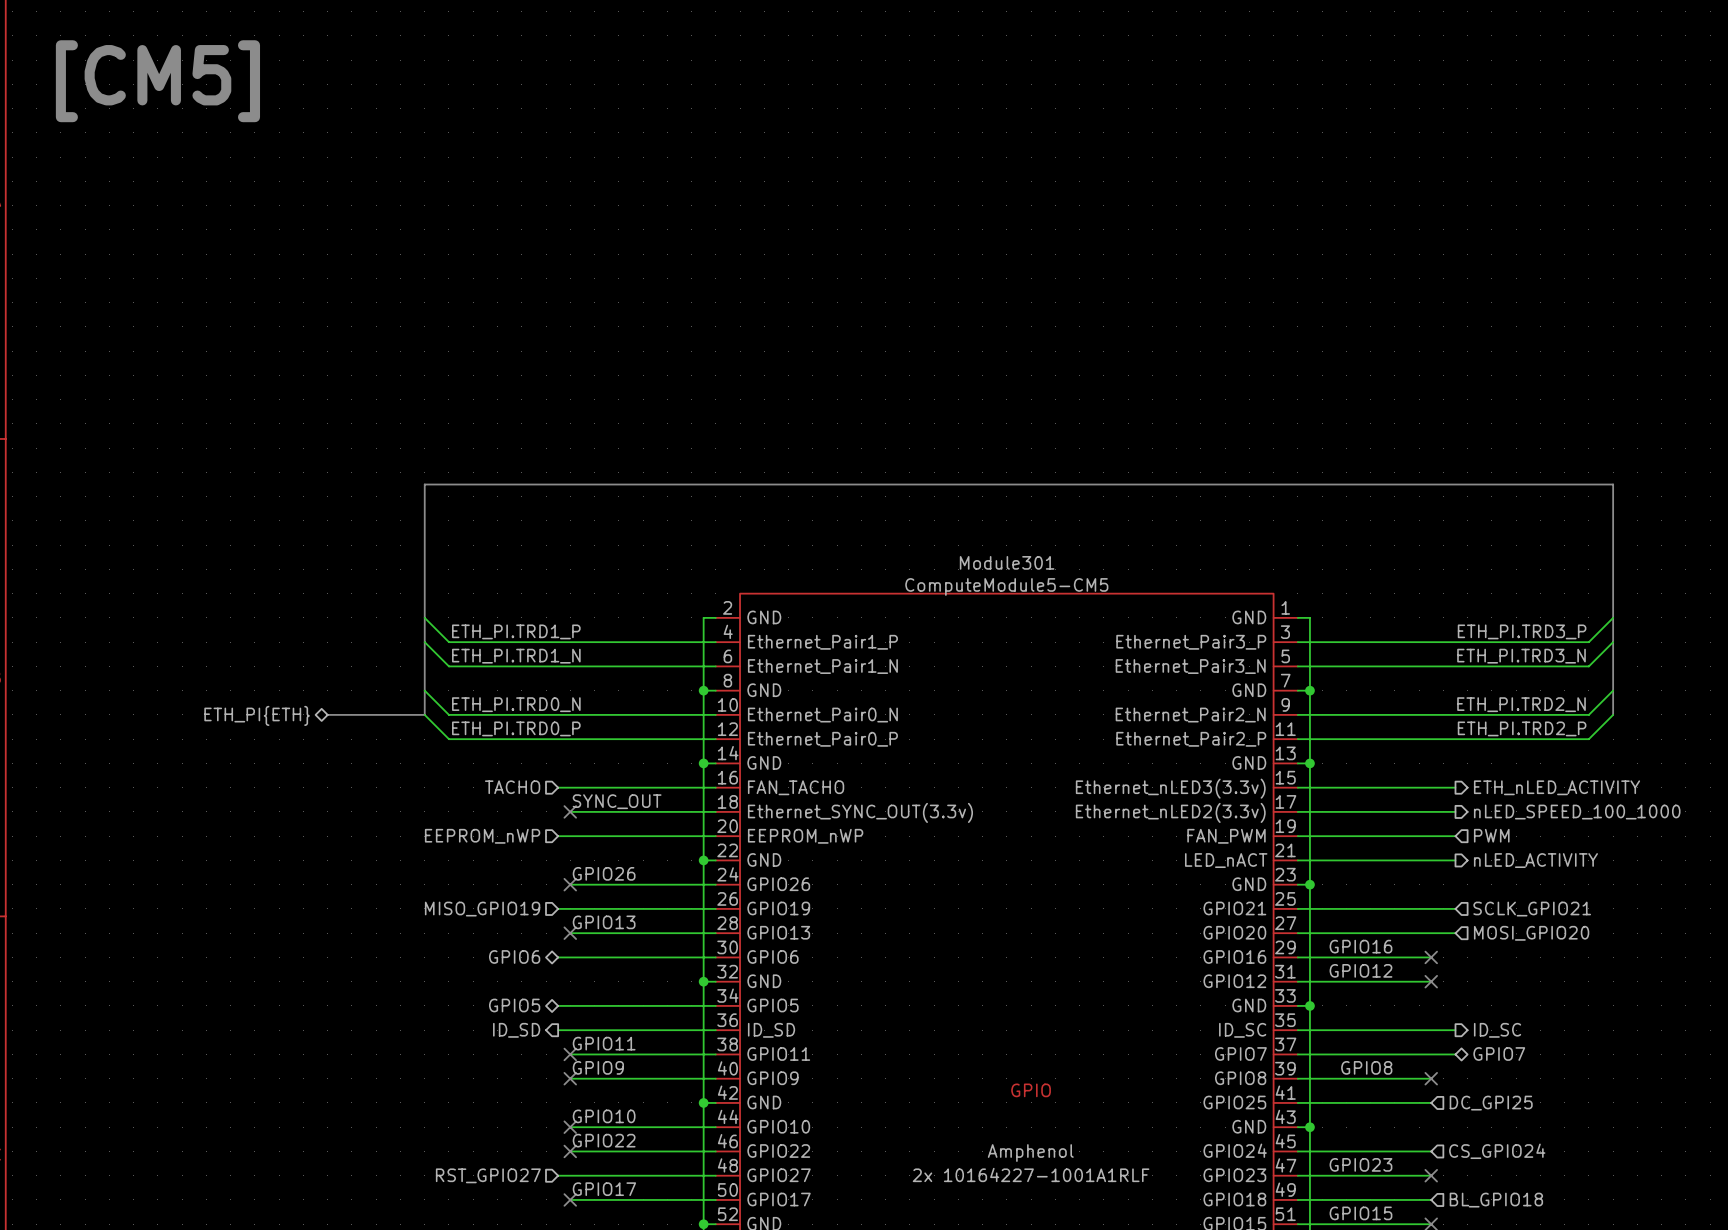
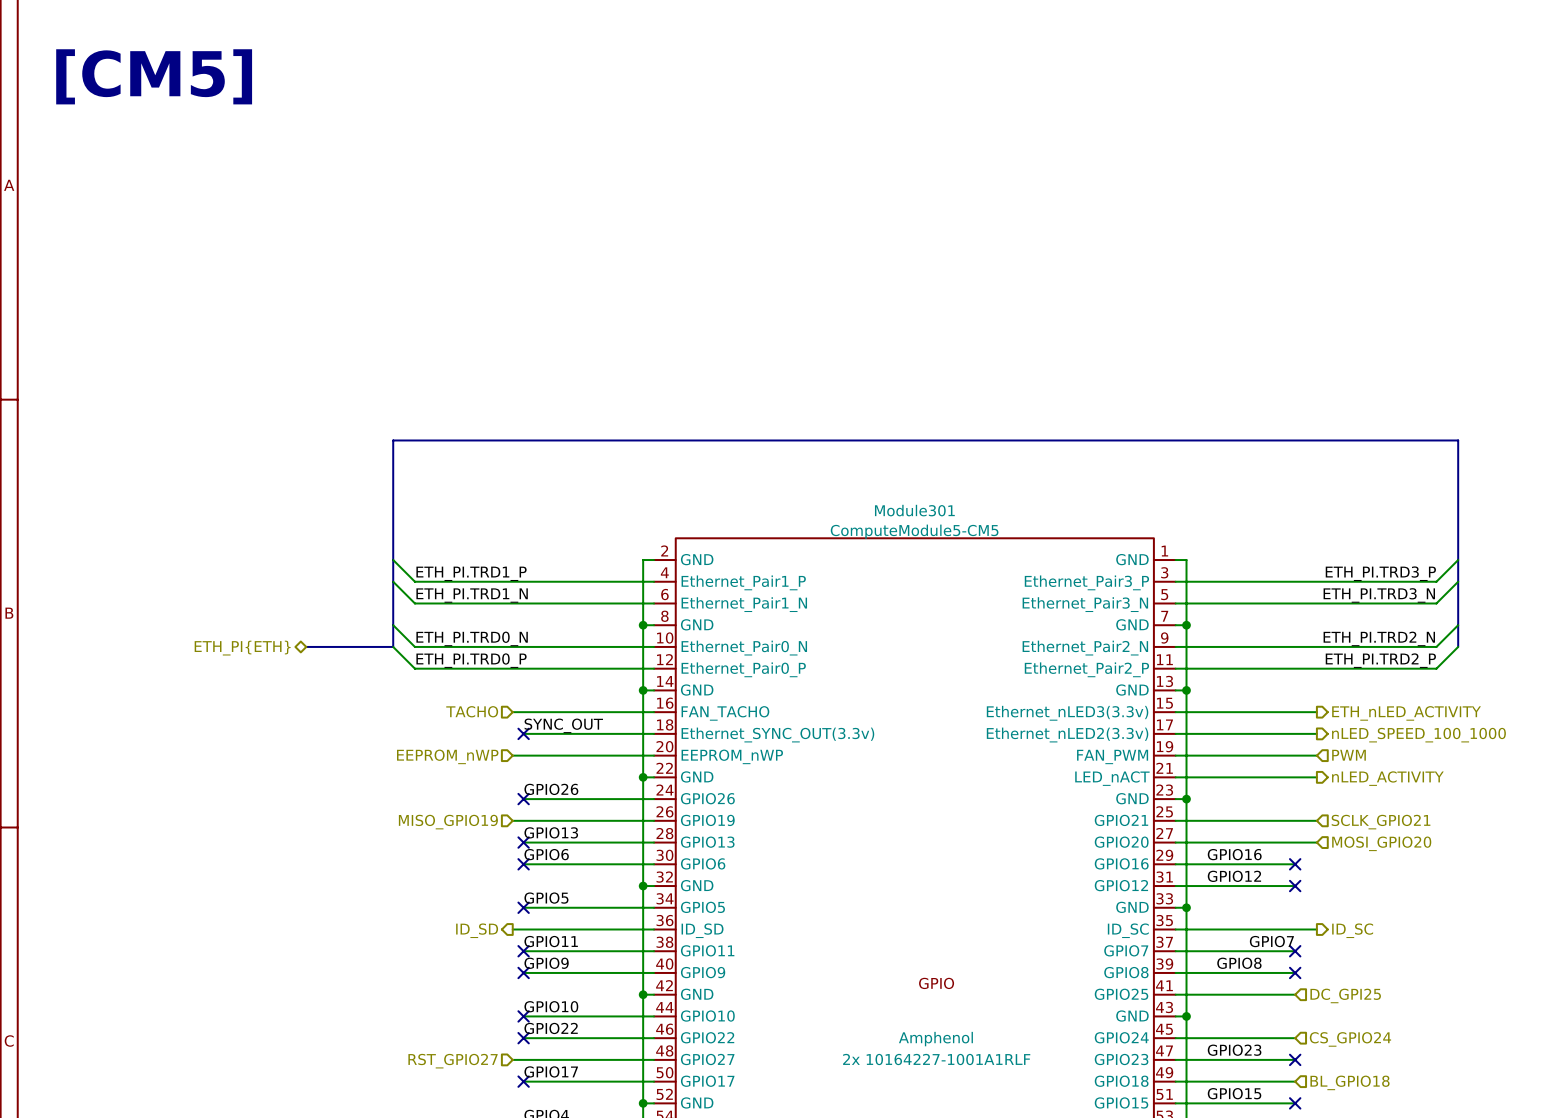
label: none -> GPIO6 (546, 854)
hierarchical label: GPIO6 (514, 956) -> none
wire: (558, 957) (570, 957) -> none
no-connect mark: none -> (523, 864)
label: none -> GPIO5 (546, 898)
hierarchical label: GPIO5 (514, 1005) -> none
wire: (558, 1005) (570, 1005) -> none
no-connect mark: none -> (523, 907)
label: none -> GPIO7 (1271, 941)
wire: (1431, 1054) (1455, 1054) -> none
no-connect mark: none -> (1295, 951)
hierarchical label: GPIO7 (1499, 1054) -> none

